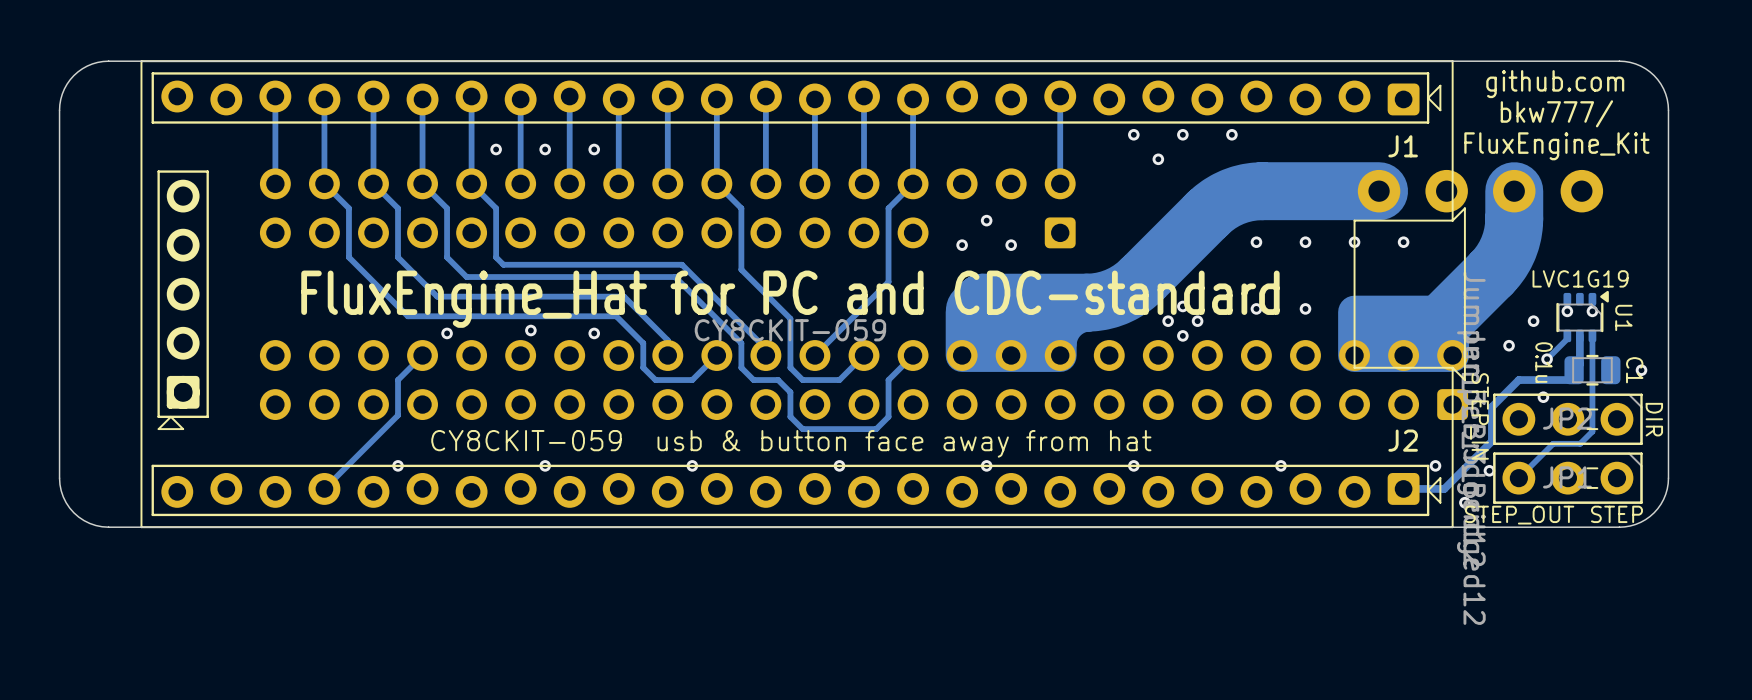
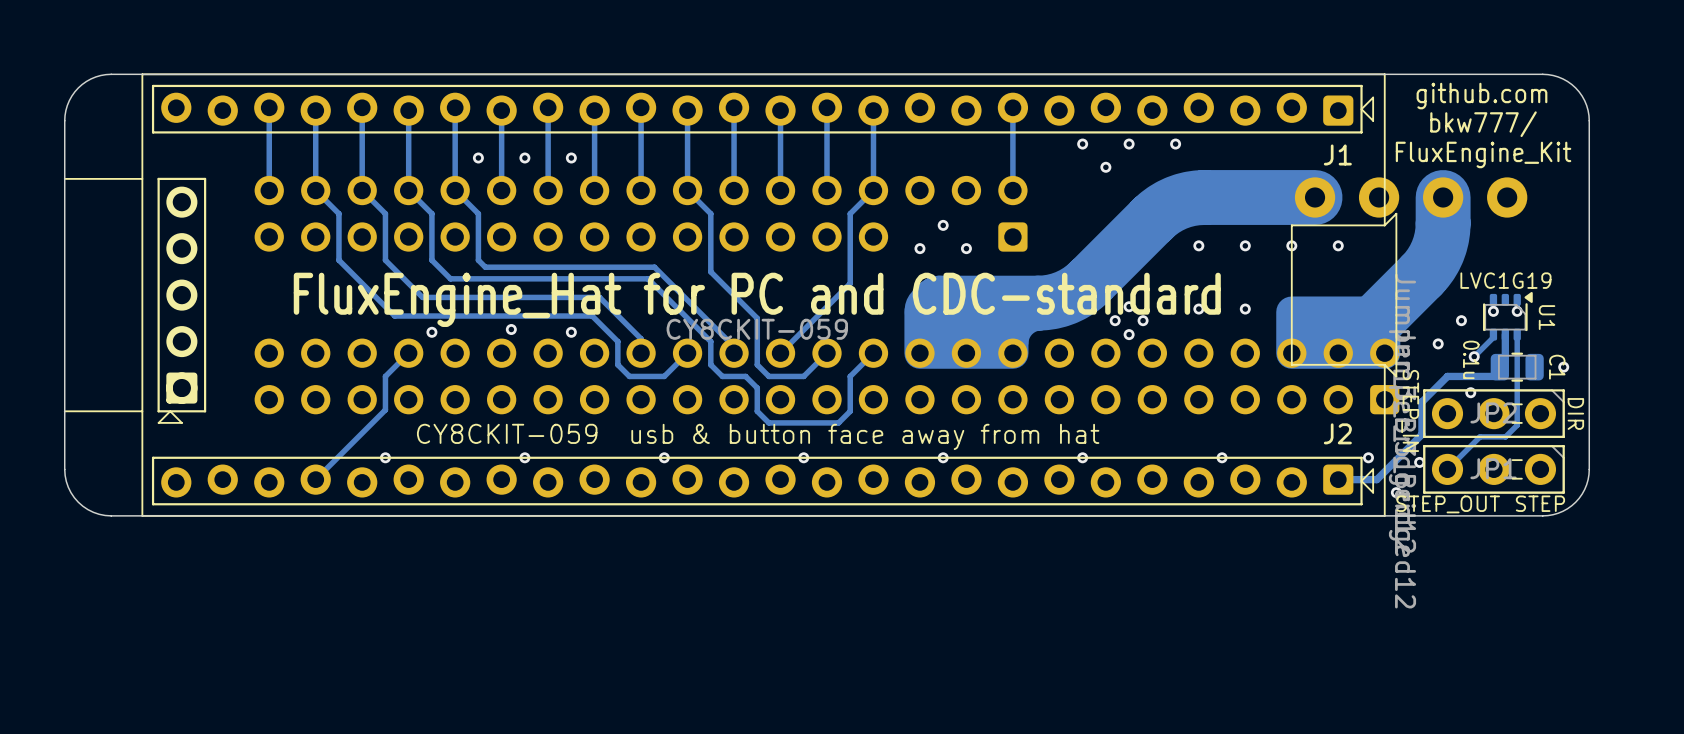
line: none -> (142, 178) (64, 178)
line: none -> (142, 411) (64, 411)

